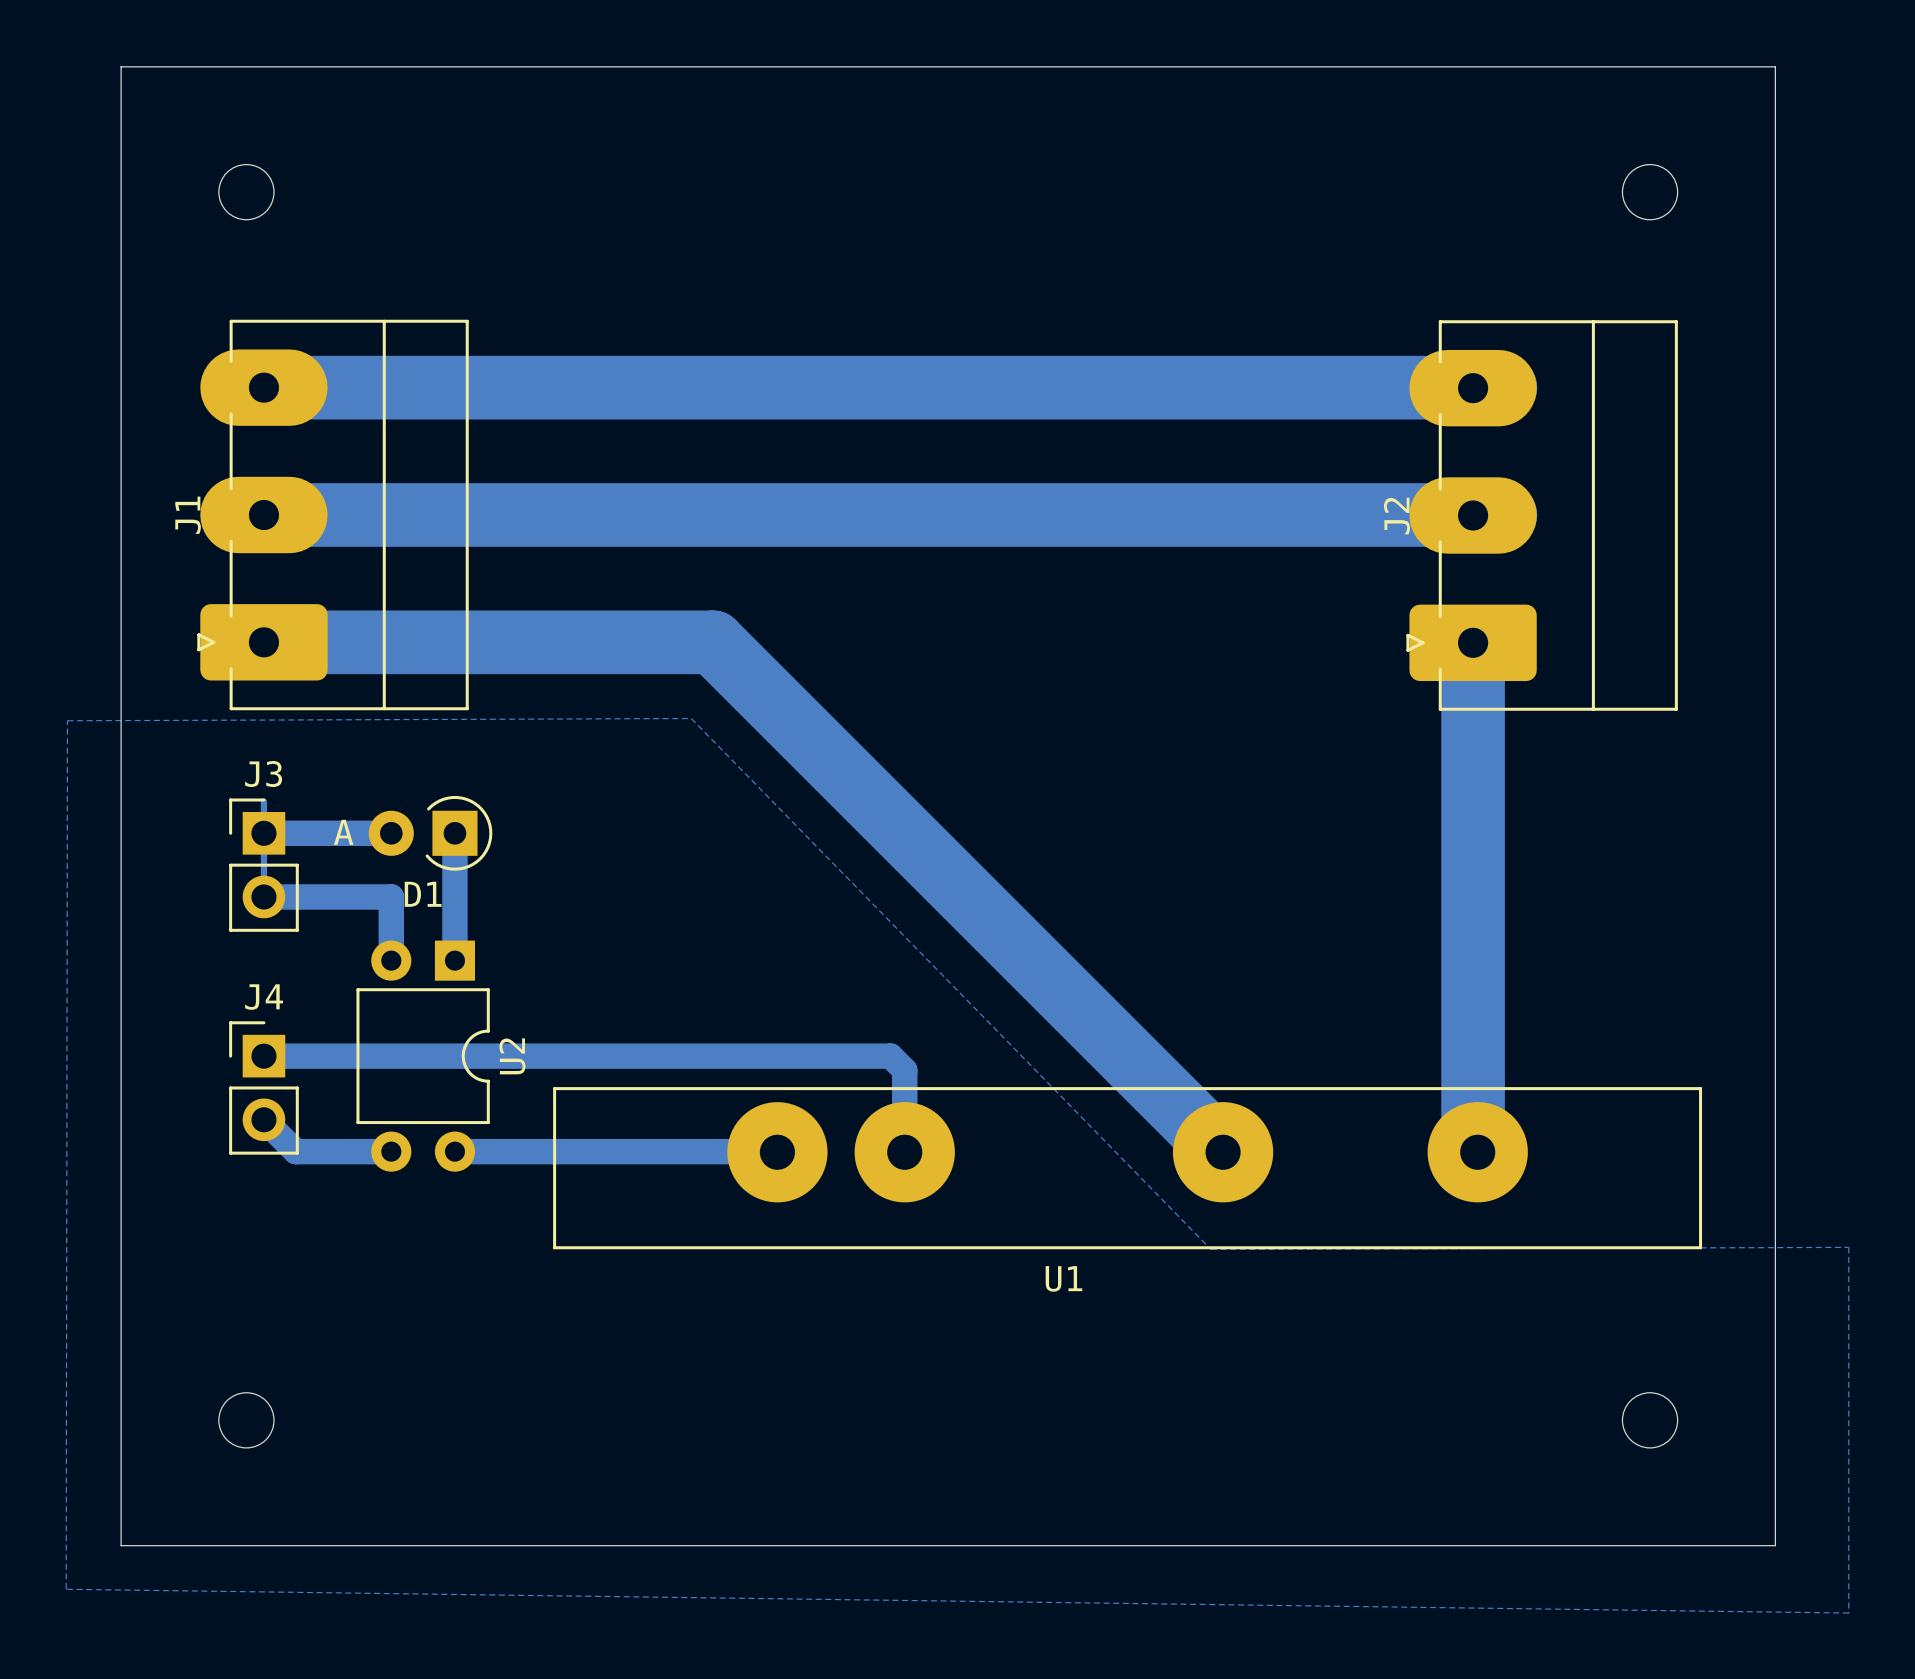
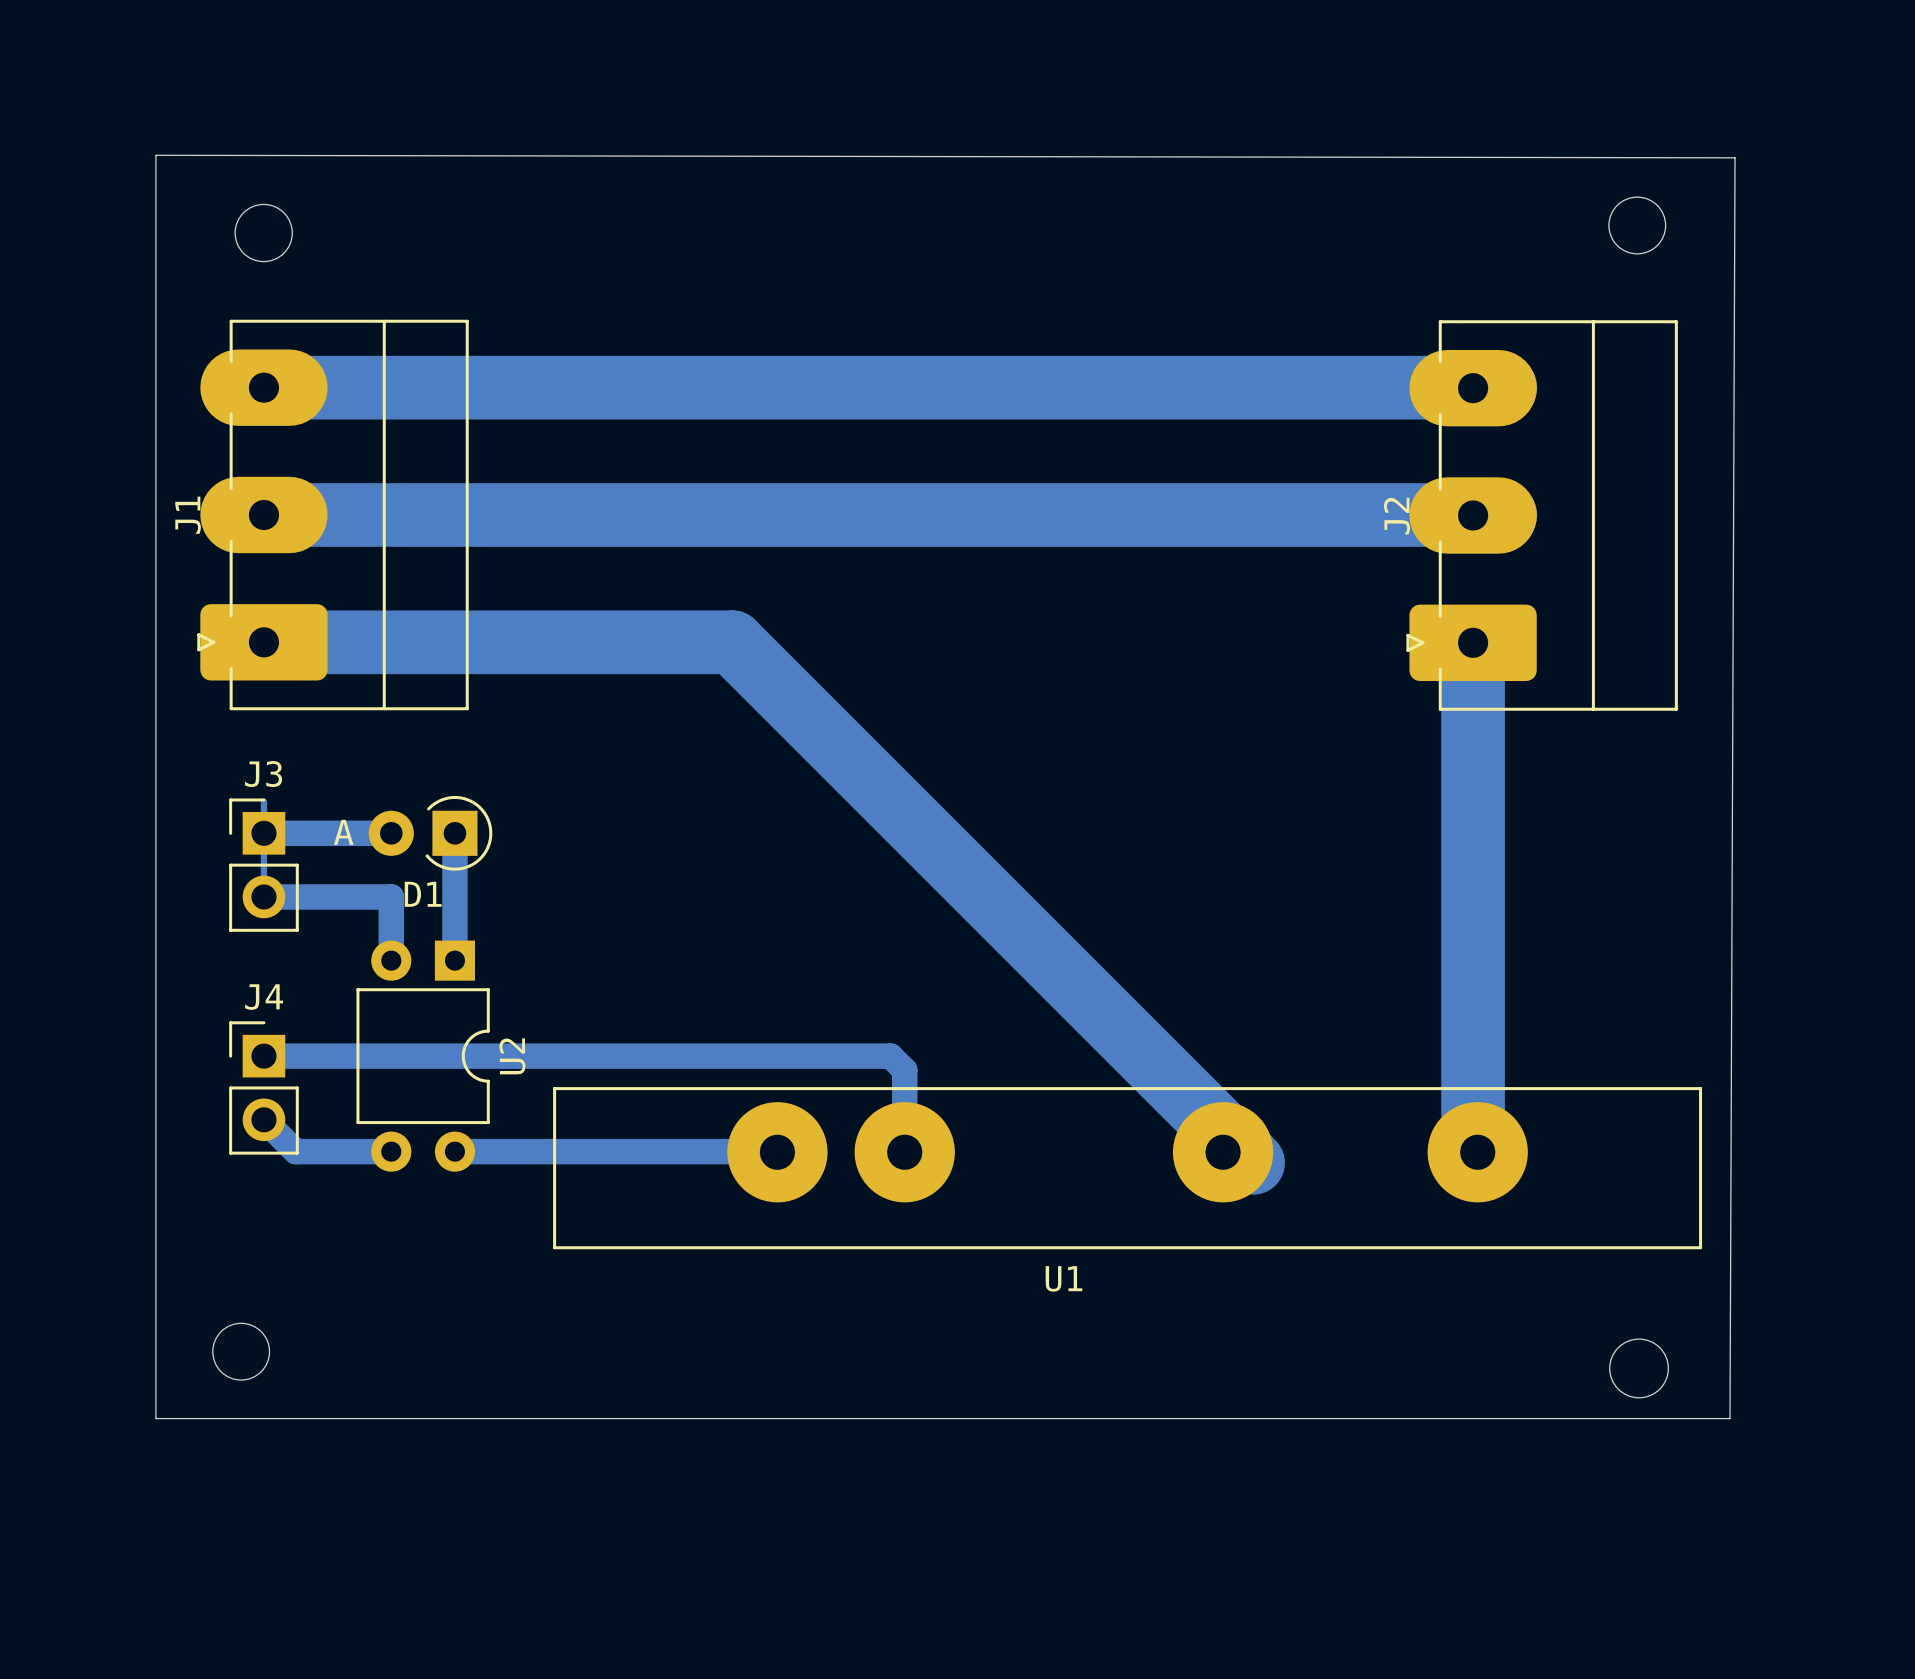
board edge: (121, 66) (121, 1545) (1775, 1545) (1775, 66) (121, 66) -> (155, 155) (155, 1418) (1730, 1418) (1735, 157) (155, 155)
round board edge: [218, 163, 275, 221] -> none
round board edge: [1621, 163, 1679, 221] -> none
round board edge: none -> [1608, 196, 1667, 255]
round board edge: none -> [234, 203, 293, 263]
bottom track: (713, 642) (1223, 1152) -> (713, 642) (732, 642) (1253, 1162)
round board edge: none -> [212, 1322, 271, 1381]
round board edge: none -> [1609, 1338, 1669, 1399]
round board edge: [218, 1392, 275, 1449] -> none
round board edge: [1621, 1392, 1679, 1449] -> none
bottom zone outline: (66, 1589) (67, 720) (691, 718) (1210, 1249) (1848, 1247) (1848, 1613) (66, 1589) -> none

